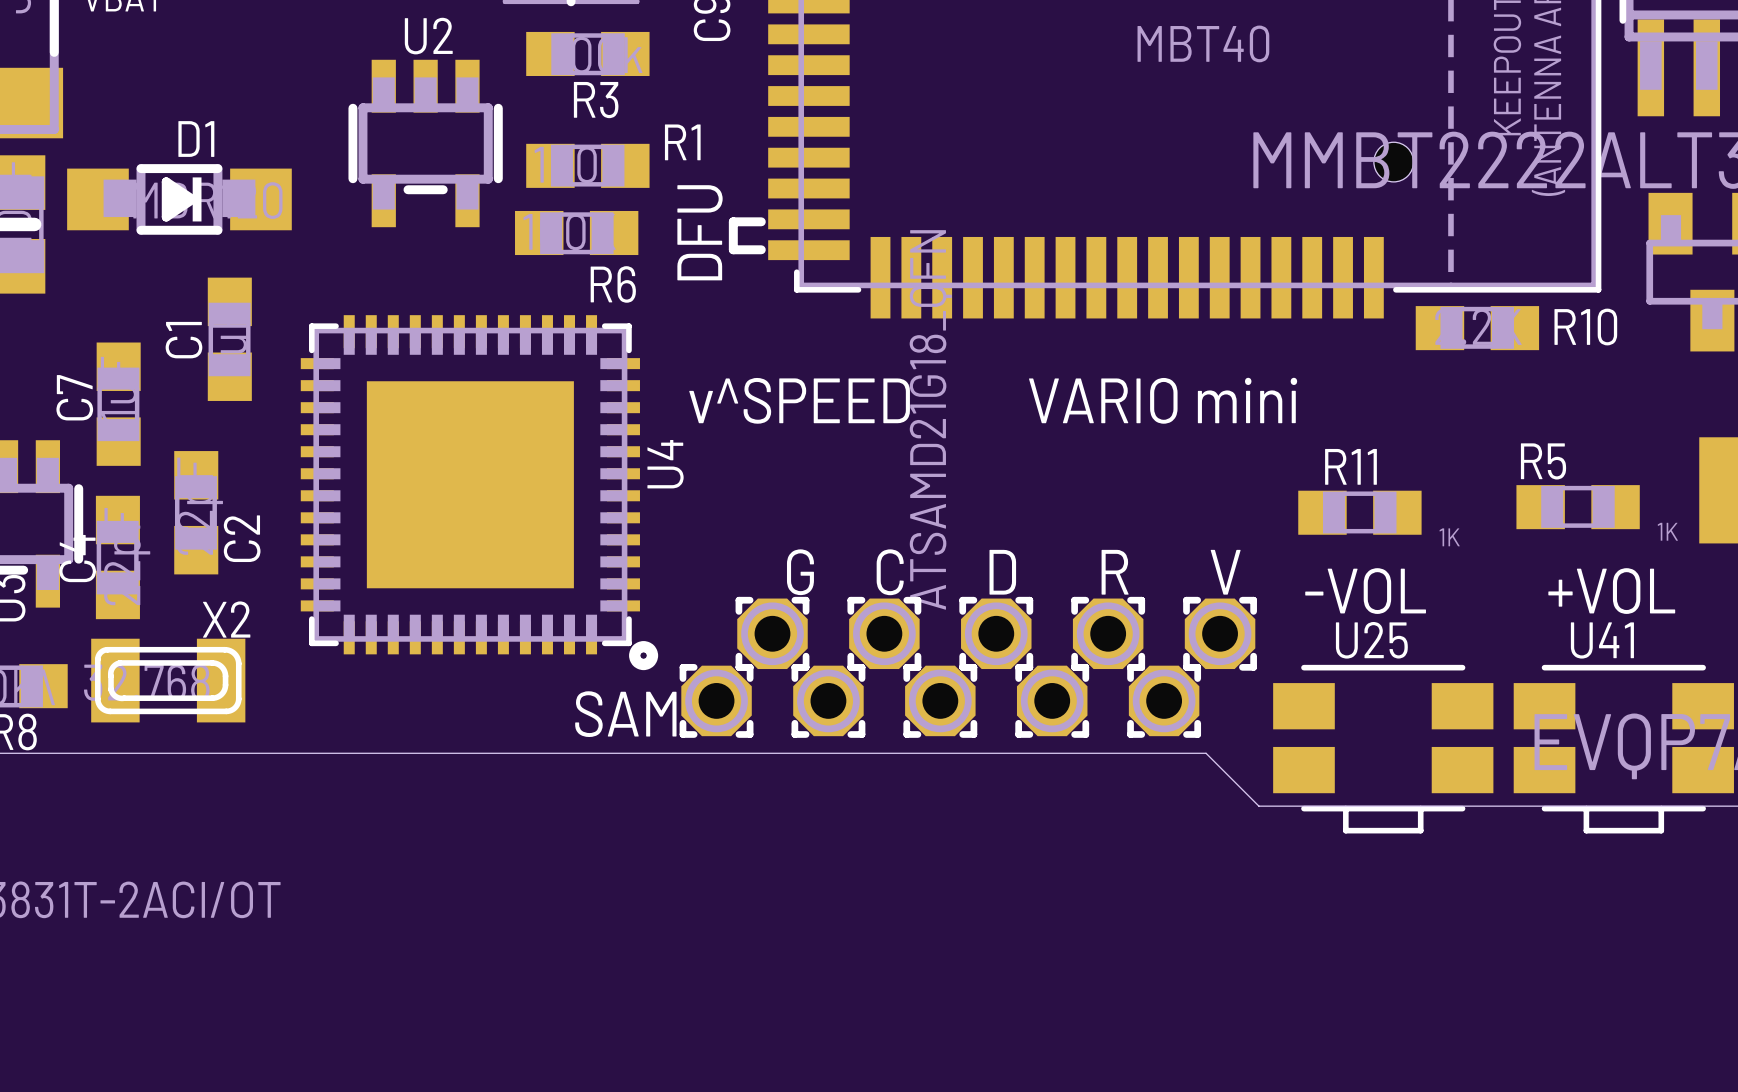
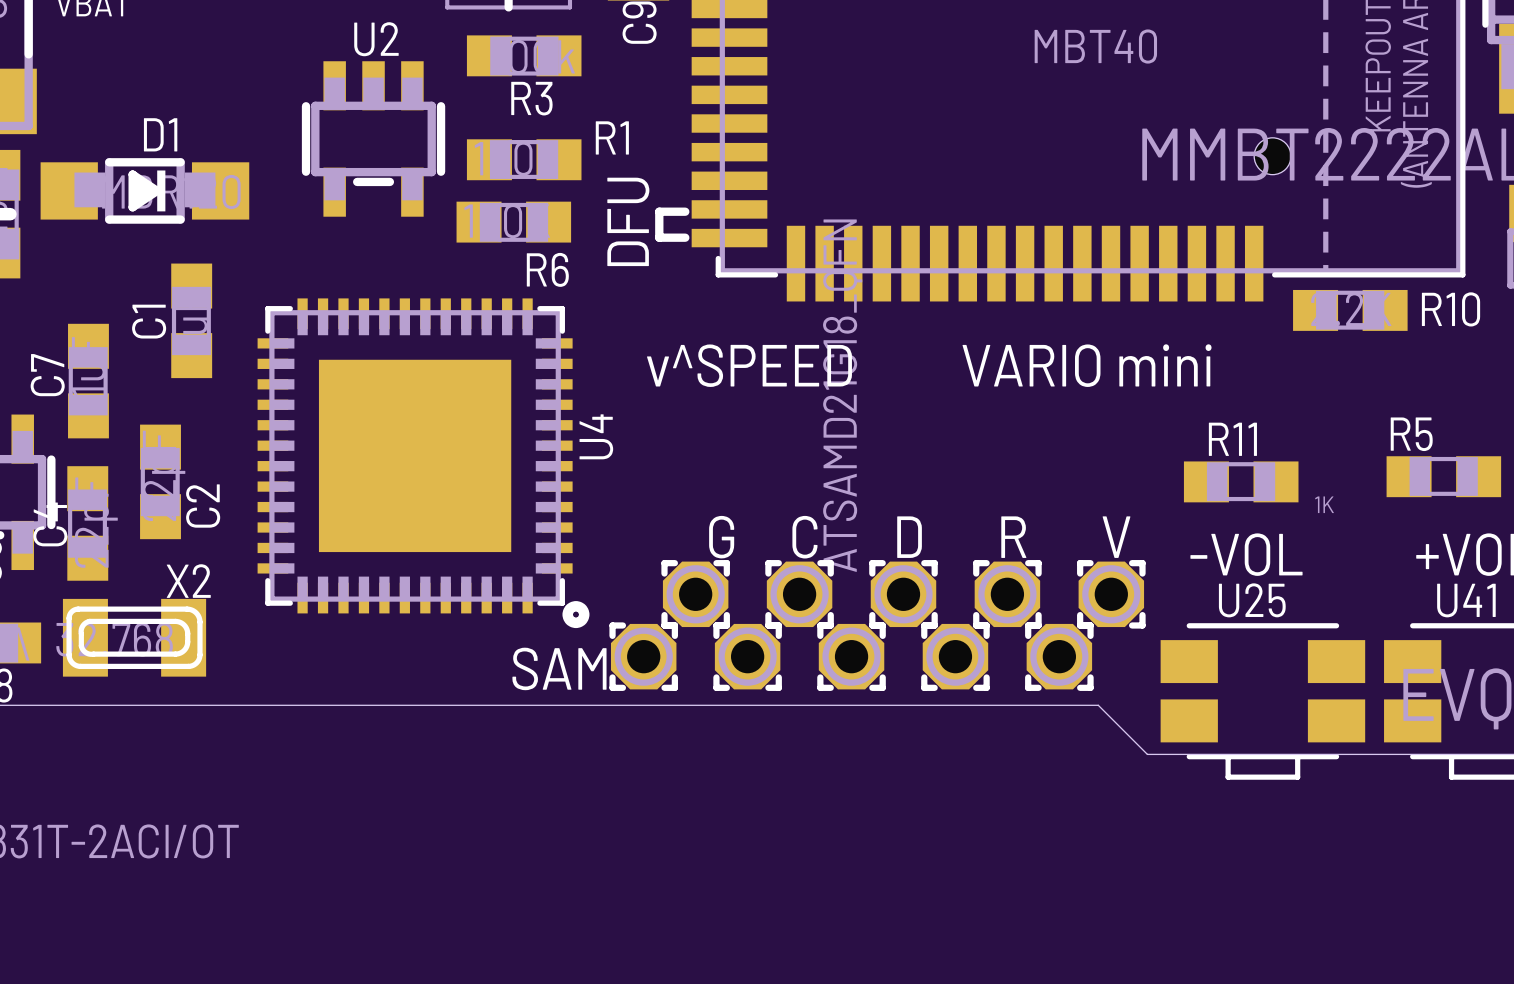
text position: v^SPEED (799, 400) -> v^SPEED (749, 365)
text position: VARIO mini (1163, 400) -> VARIO mini (1087, 365)

